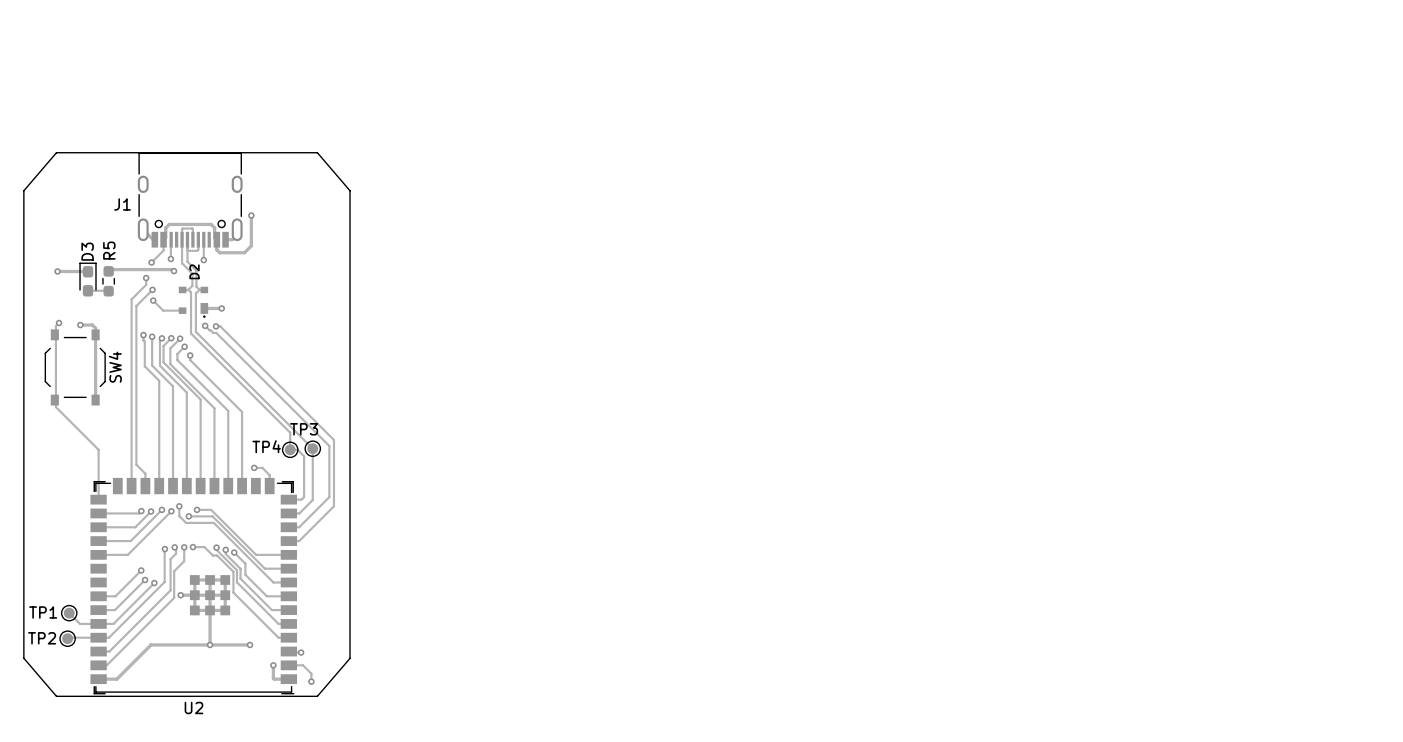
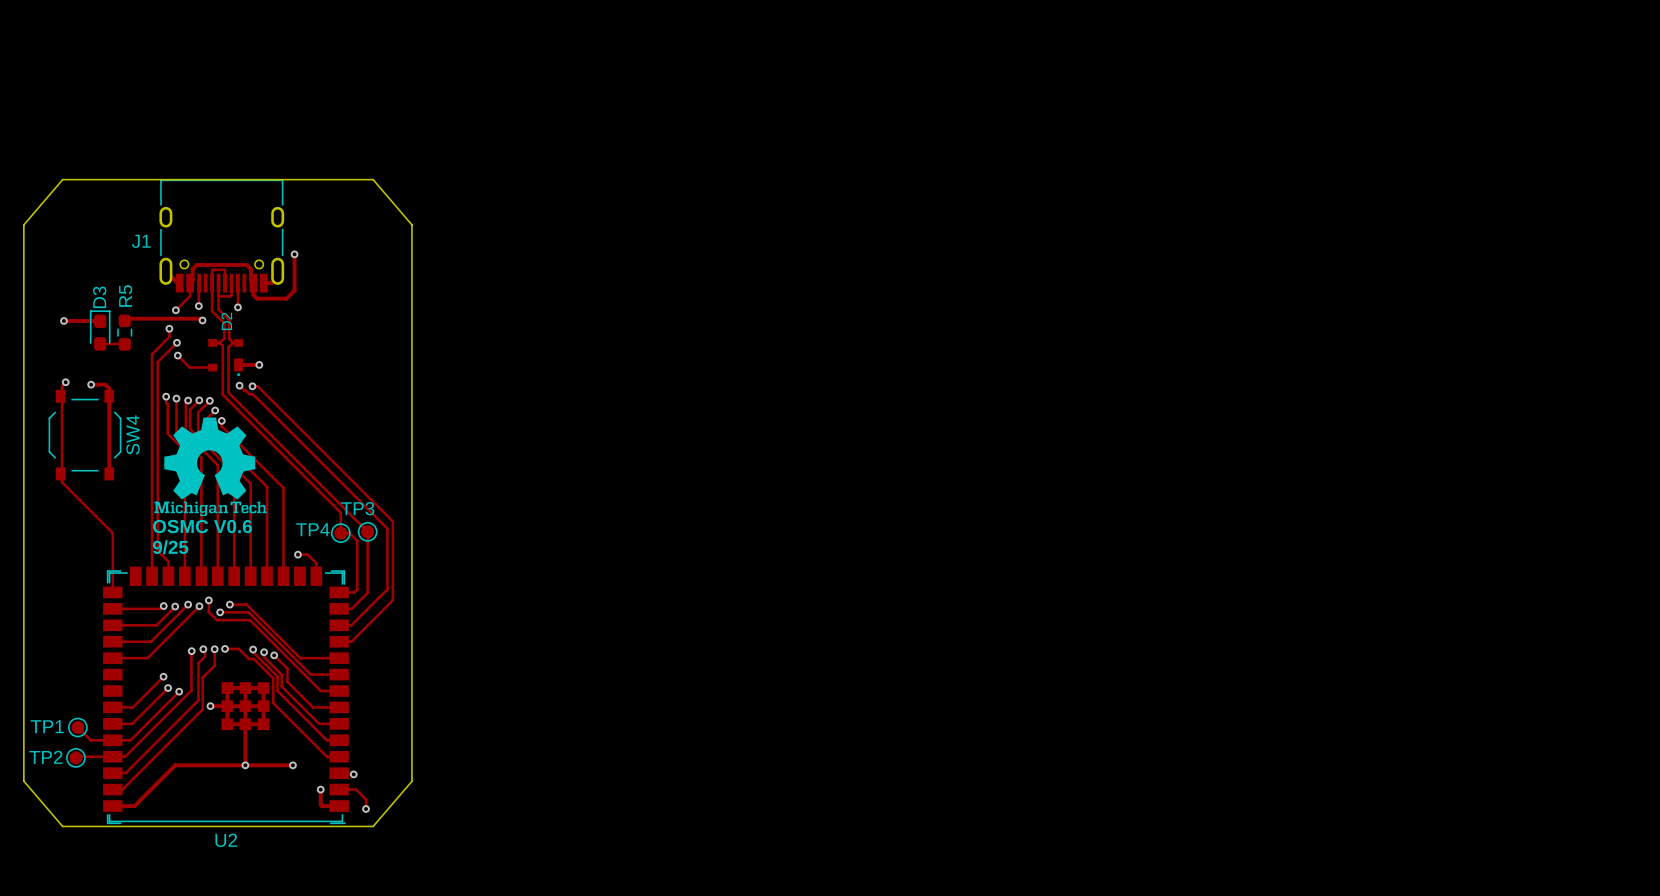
drawing: none -> [154, 417, 267, 517]
text: none -> OSMC V0.6 (202, 526)
text: none -> 9/25 (170, 547)

